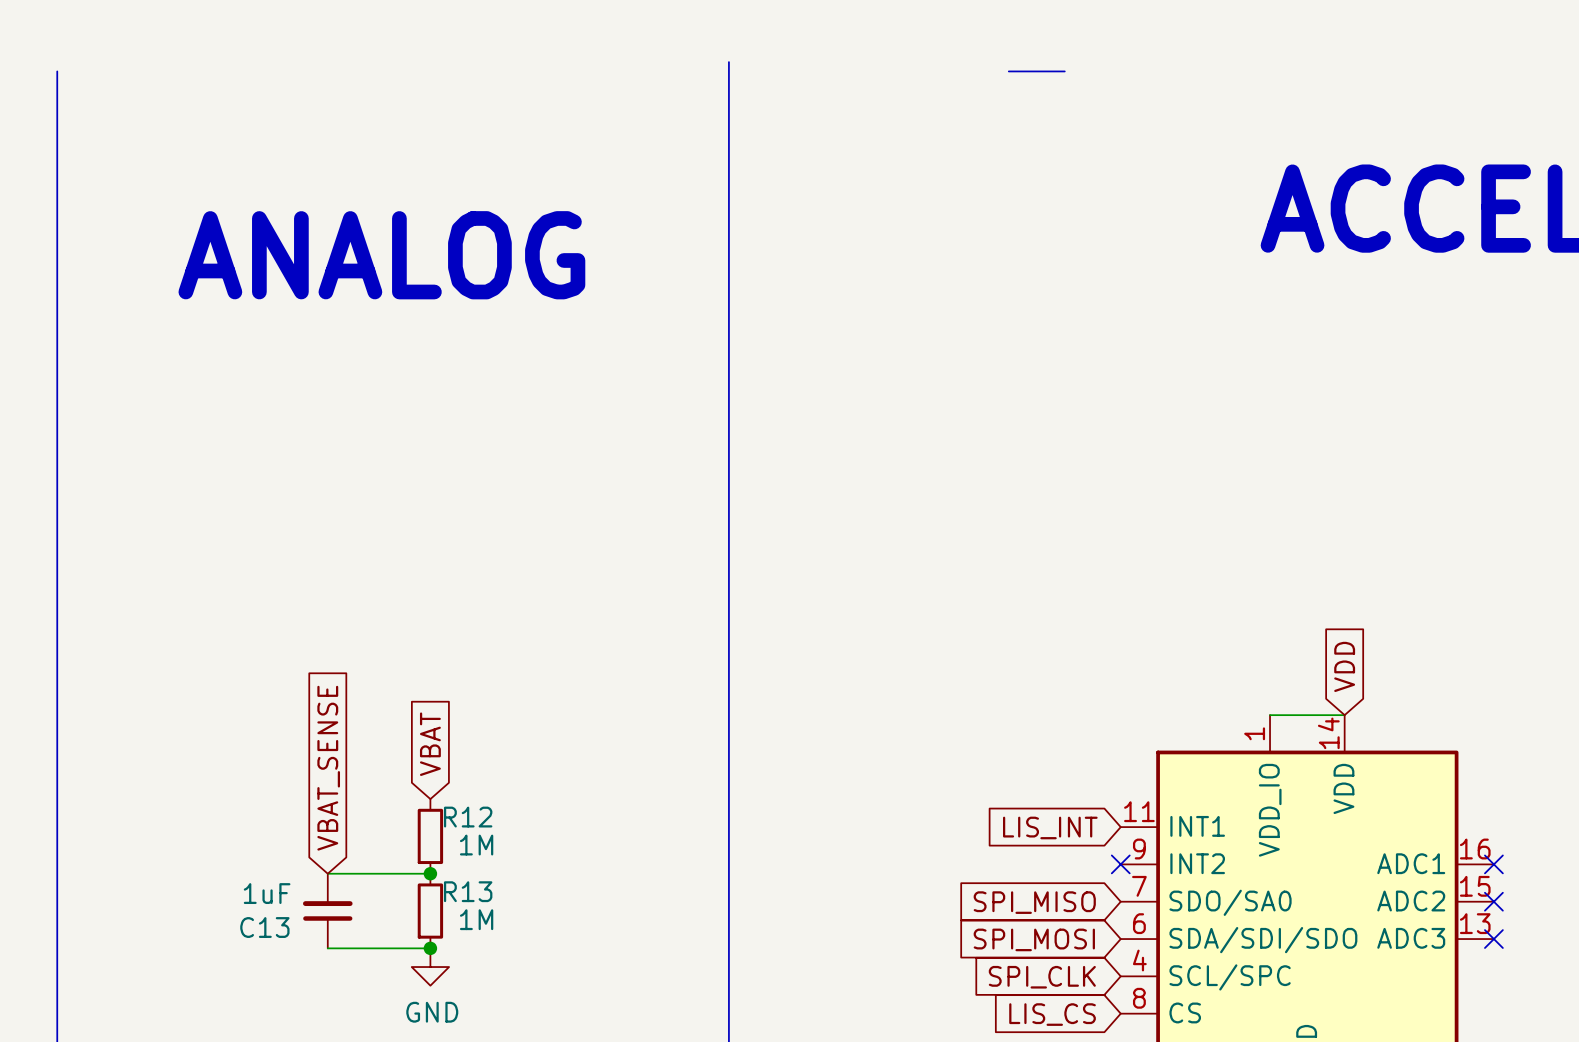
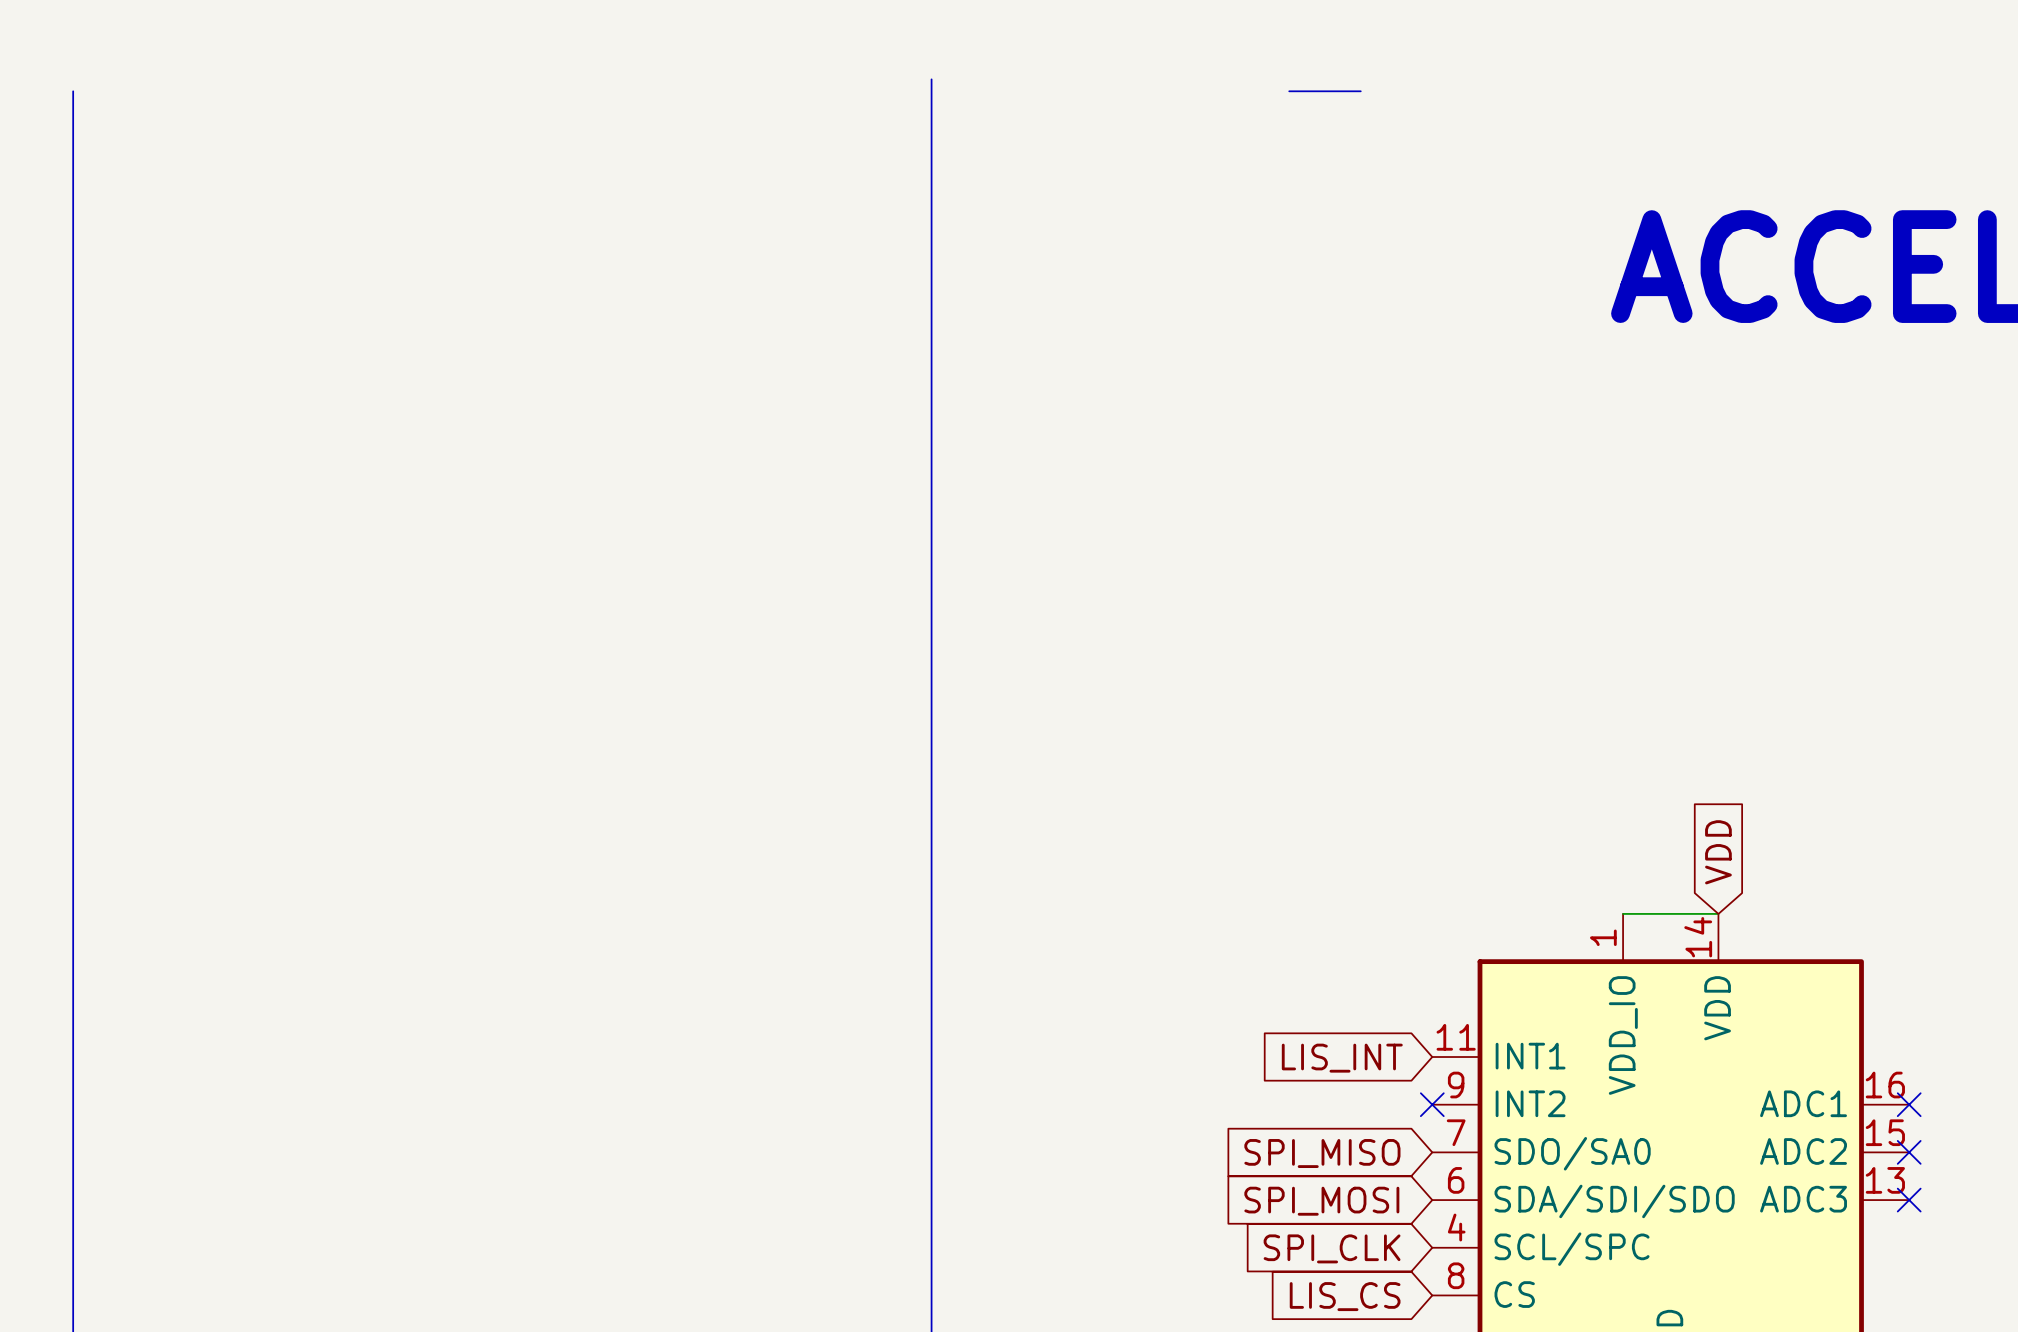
text: ANALOG (381, 255) -> none
global label: VBAT (430, 744) -> none
global label: VBAT_SENSE (328, 768) -> none
R12: 1M (430, 836) -> none
wire: (327, 873) (430, 873) -> none
junction: (430, 873) -> none
C13: 1uF (327, 911) -> none
R13: 1M (430, 911) -> none
wire: (327, 948) (430, 948) -> none
junction: (430, 948) -> none
power symbol: GND (430, 967) -> none

